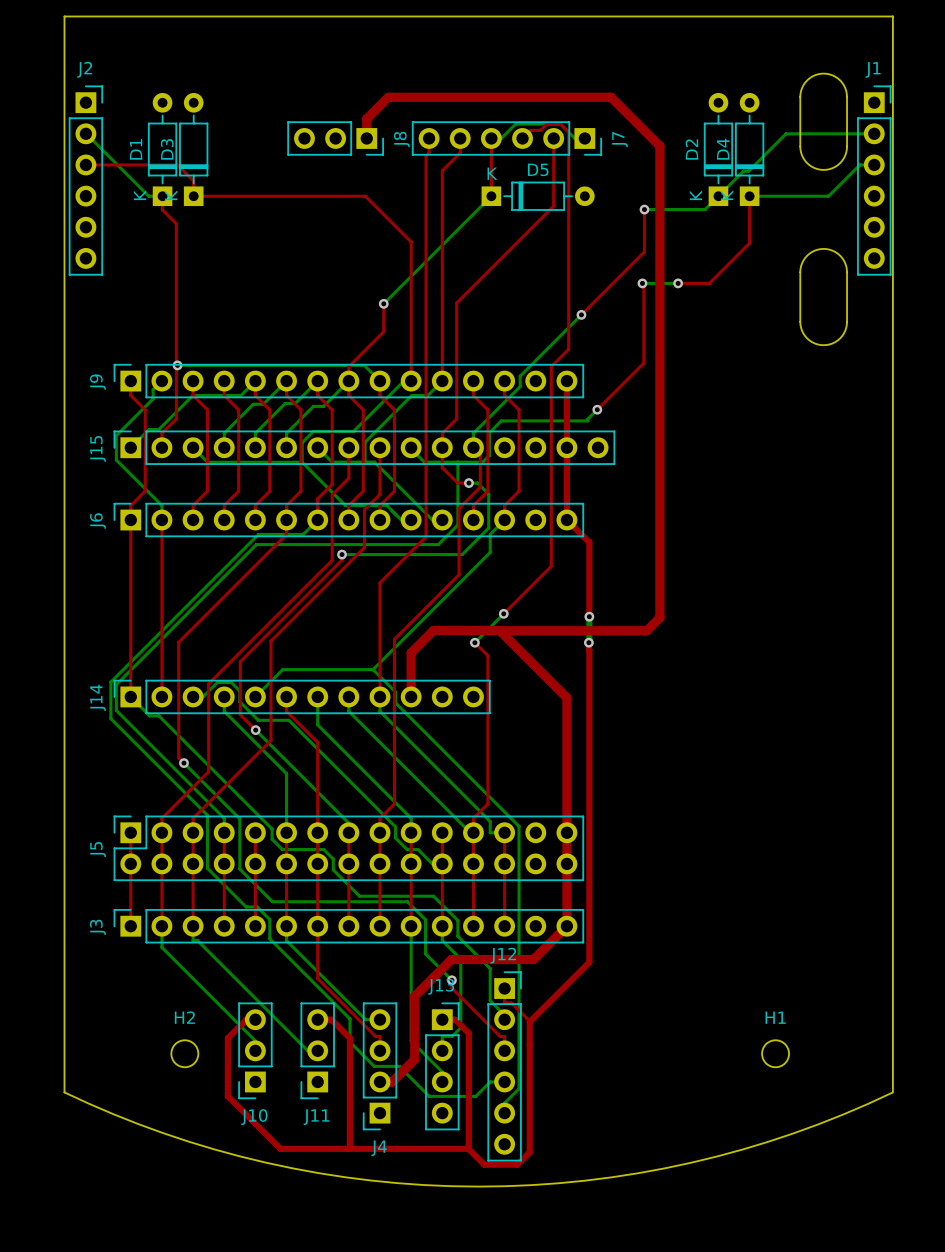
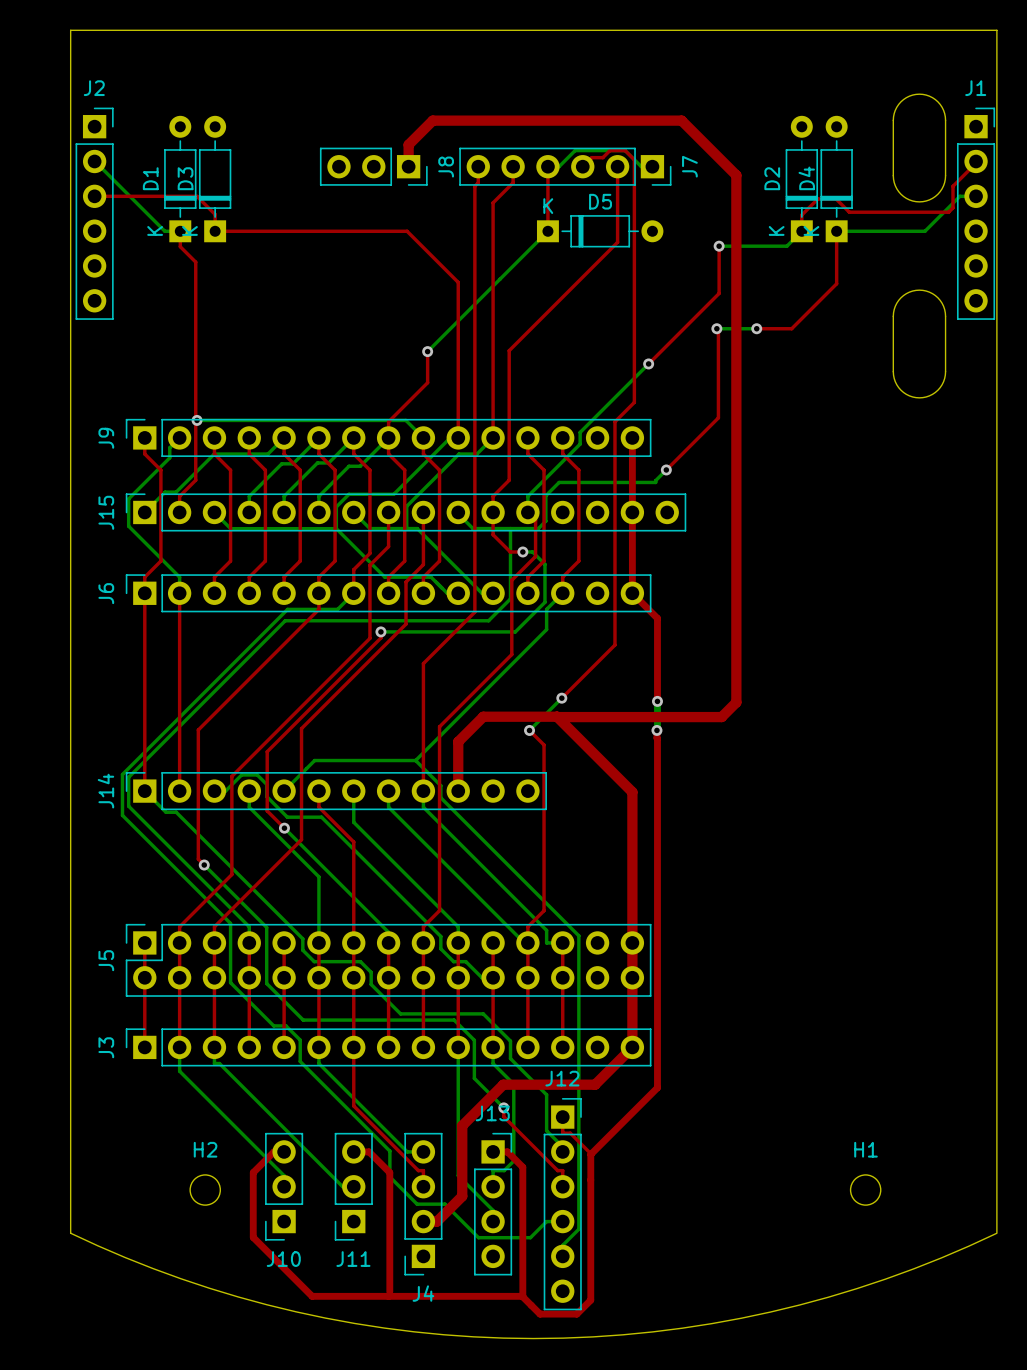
top track: none -> (976, 161) (953, 186) (953, 207) (948, 212) (849, 212) (836, 198) (817, 198) (801, 215) (801, 231)
bottom track: (874, 133) (786, 133) (748, 171) (743, 171) (718, 196) -> none

